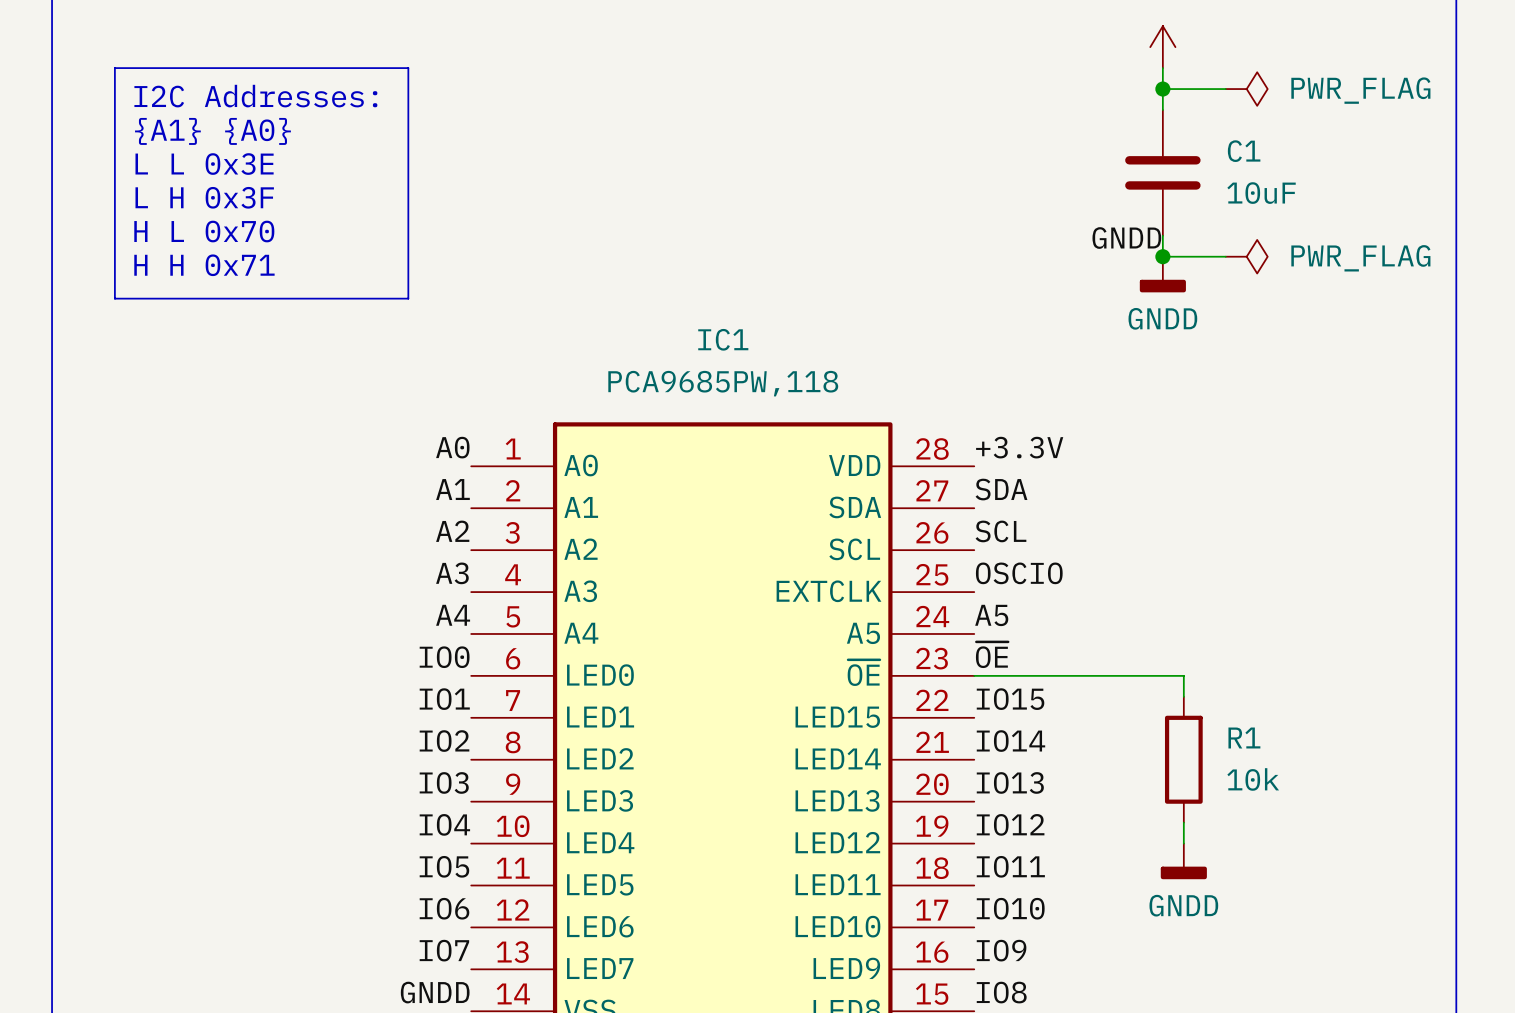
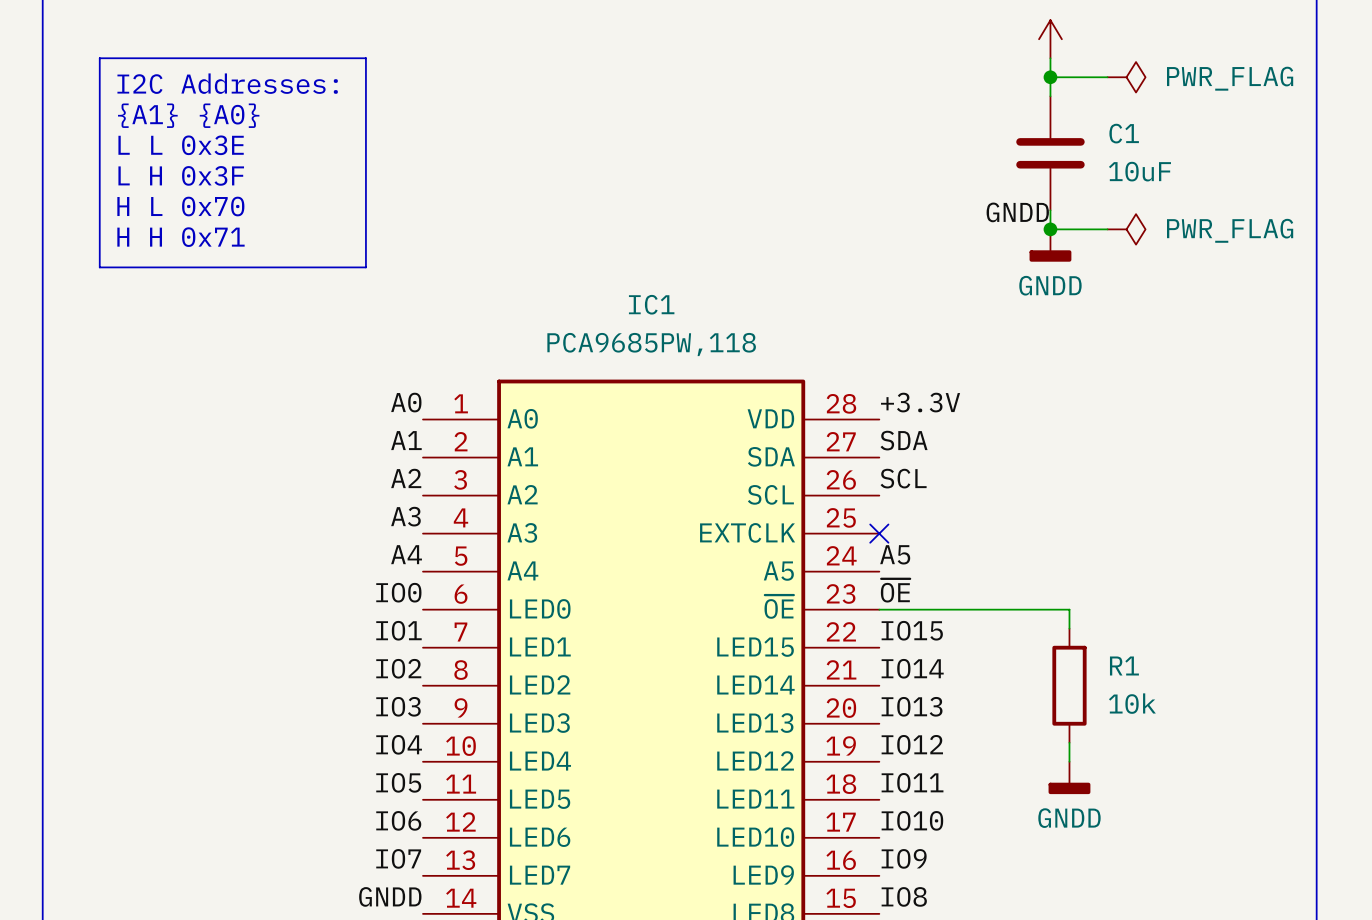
label: OSCIO (1019, 573) -> none
no-connect mark: none -> (879, 533)

